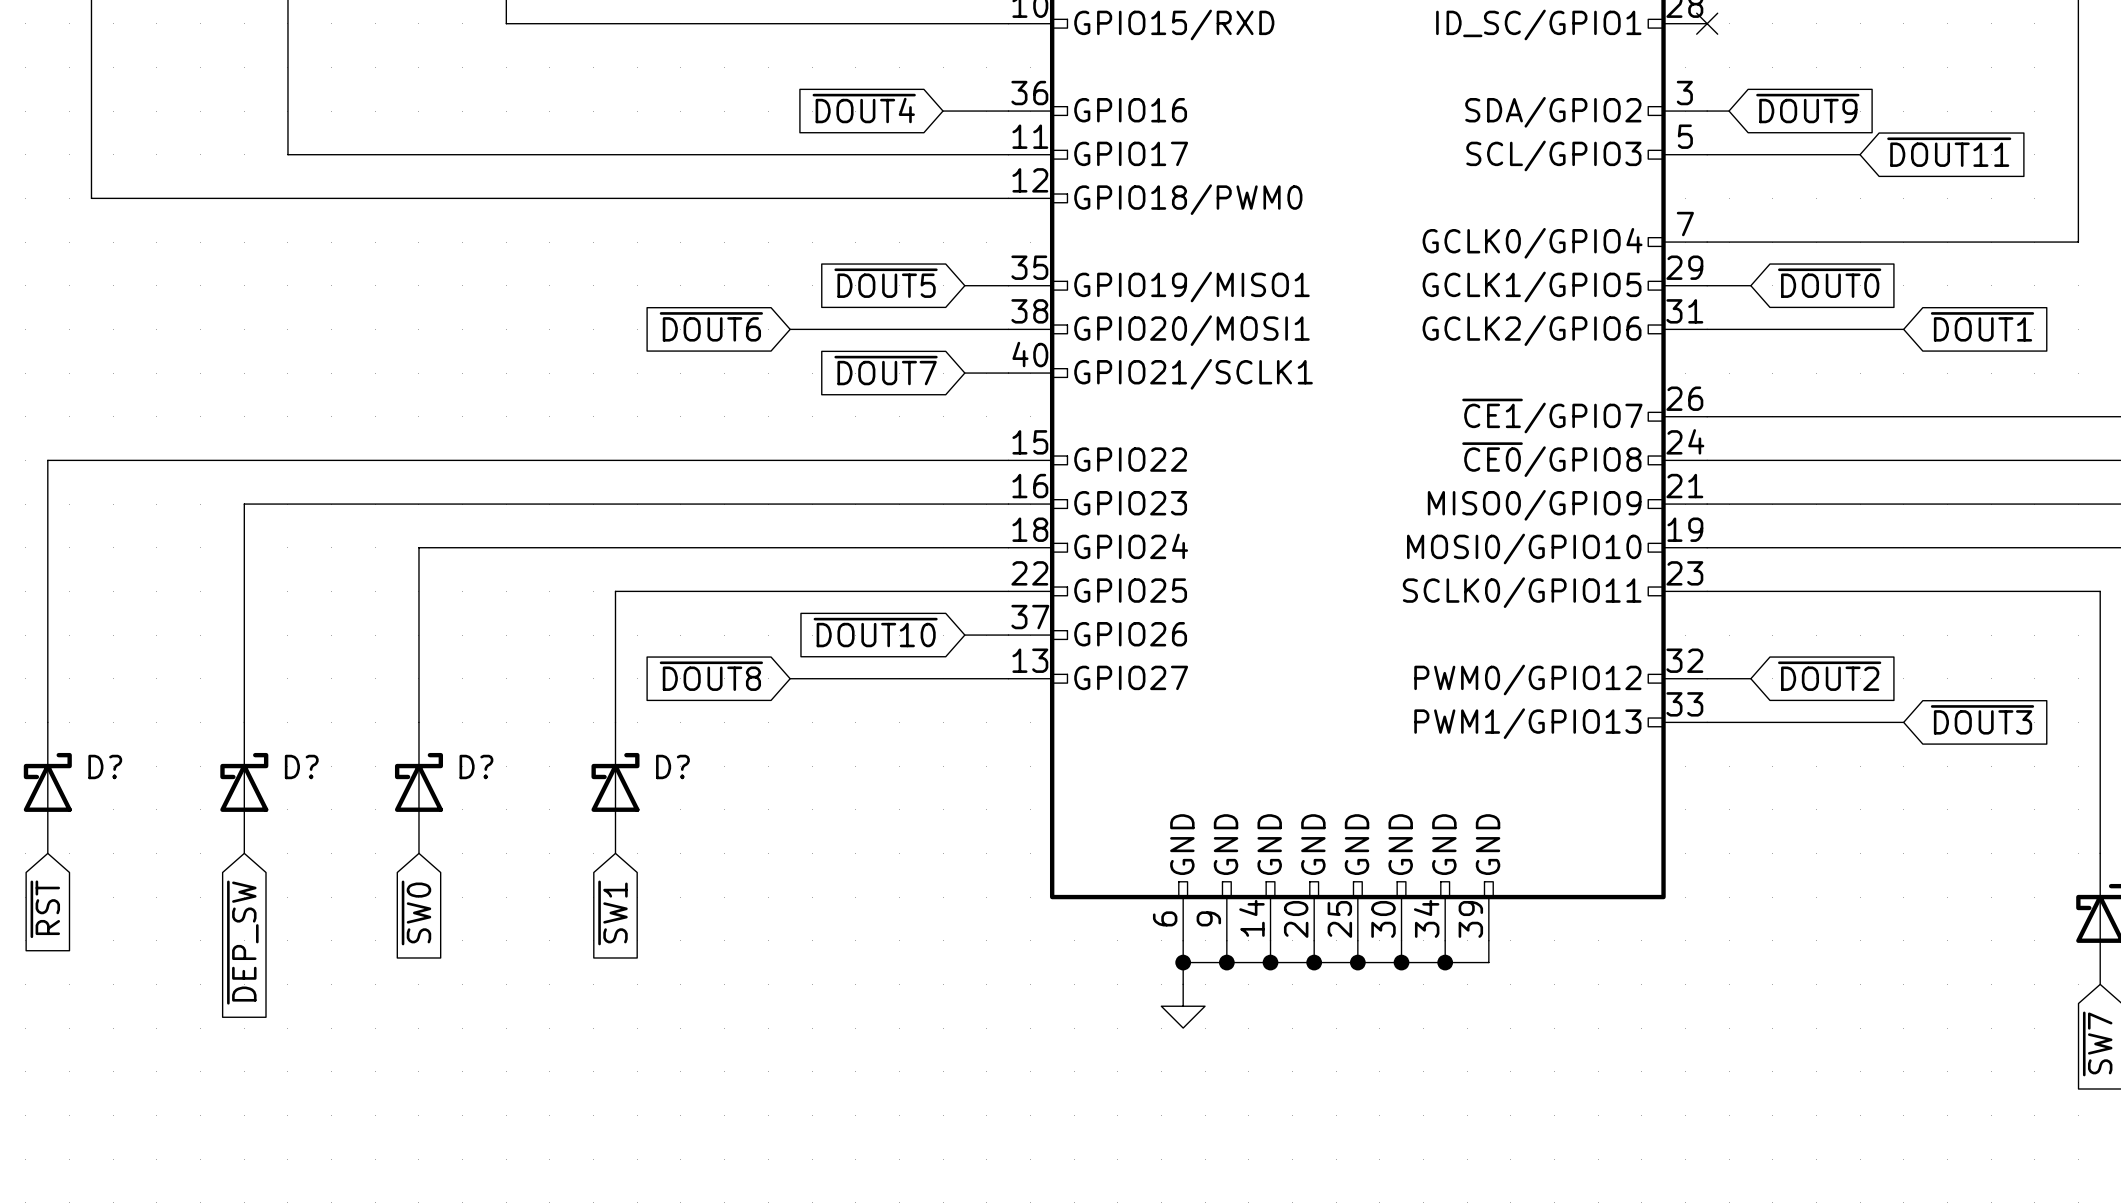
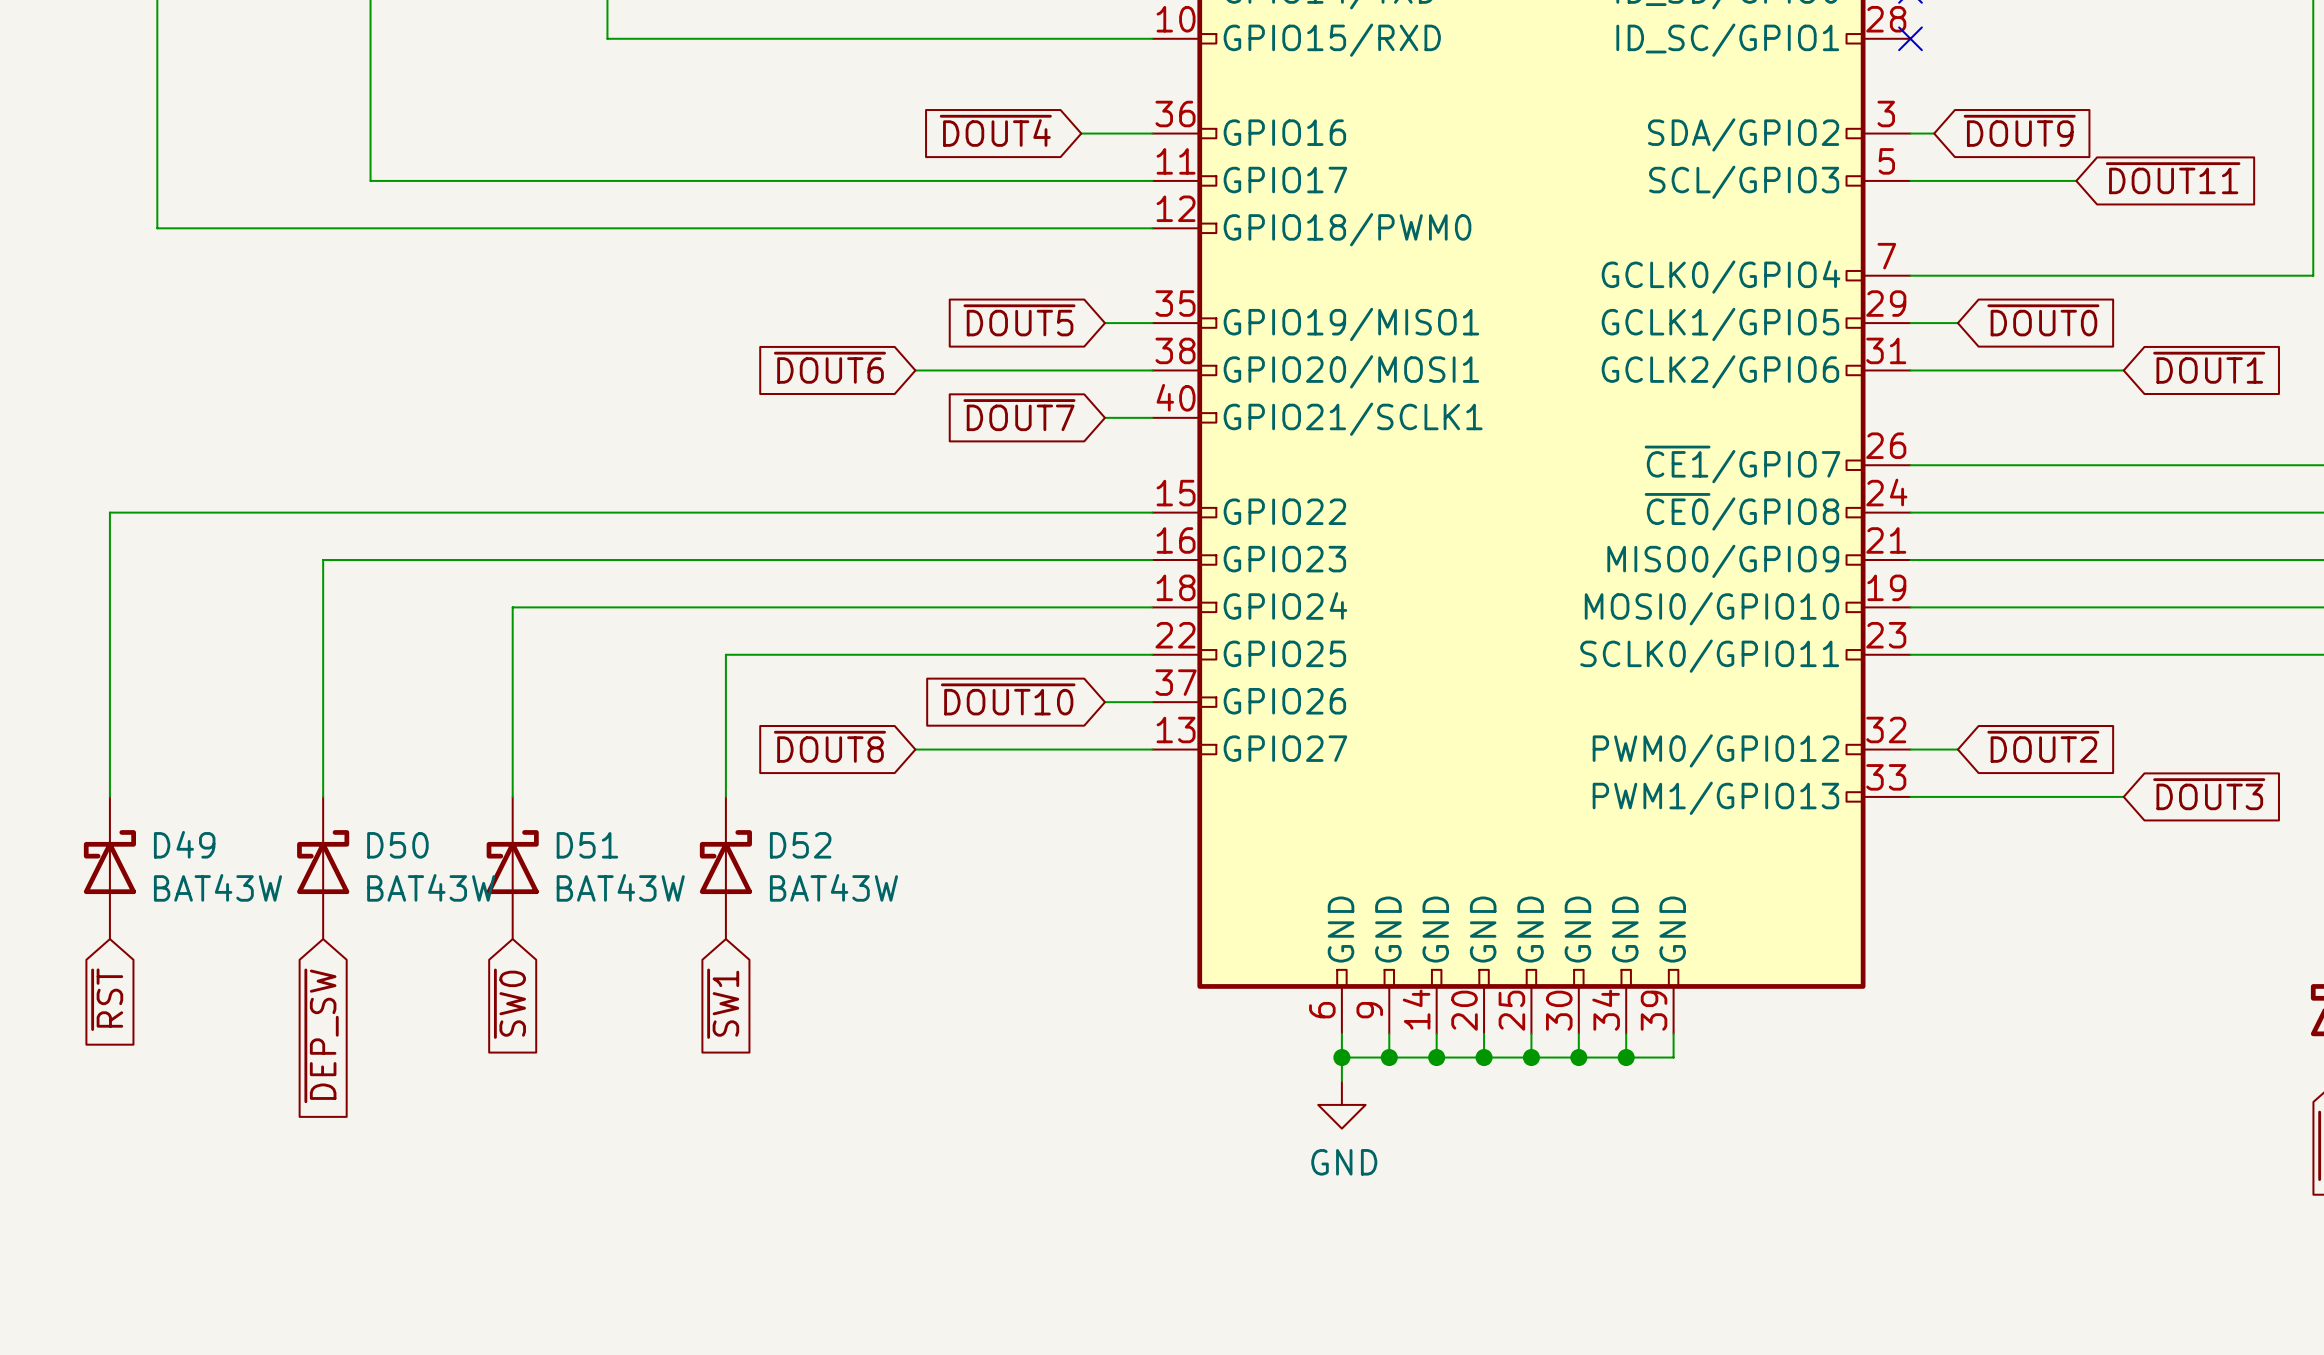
D? name: D? (105, 766) -> D49 (184, 844)
D? name: D? (301, 766) -> D50 (397, 845)
D? name: D? (476, 766) -> D51 (587, 845)
D? name: D? (672, 766) -> D52 (800, 845)
D? value: none -> BAT43W (217, 887)
D? value: none -> BAT43W (431, 887)
D? value: none -> BAT43W (620, 887)
D? value: none -> BAT43W (833, 887)
power symbol text: none -> GND (1344, 1162)

